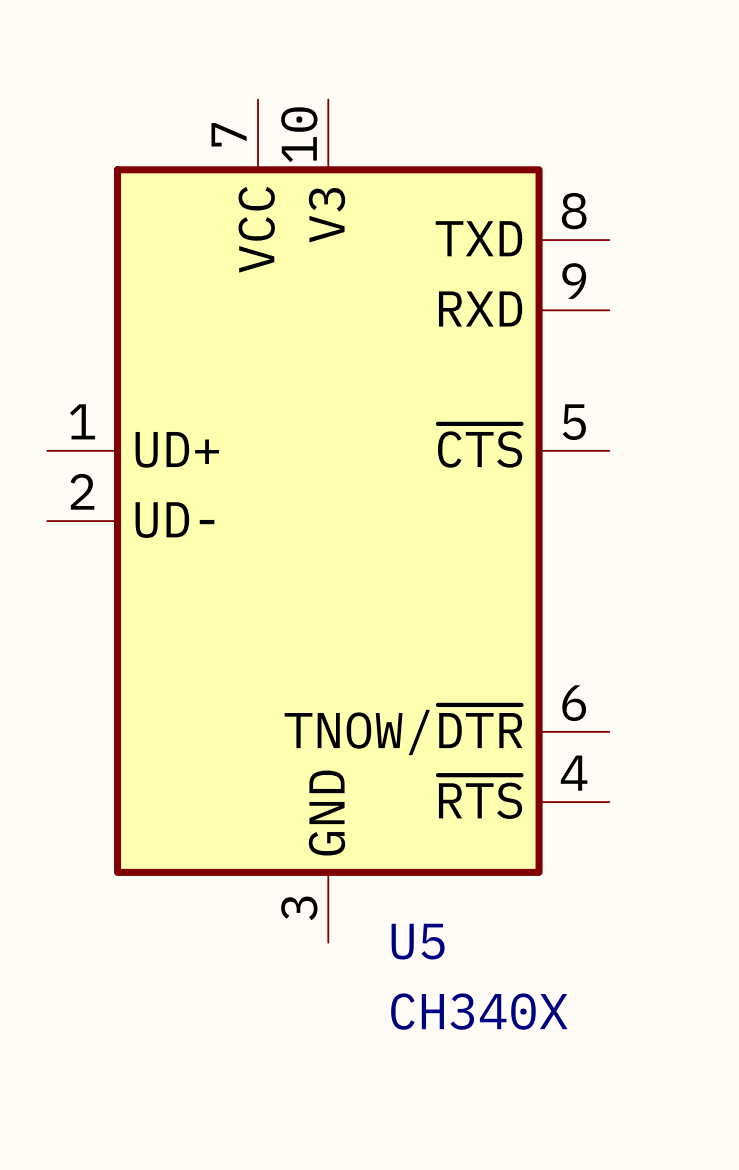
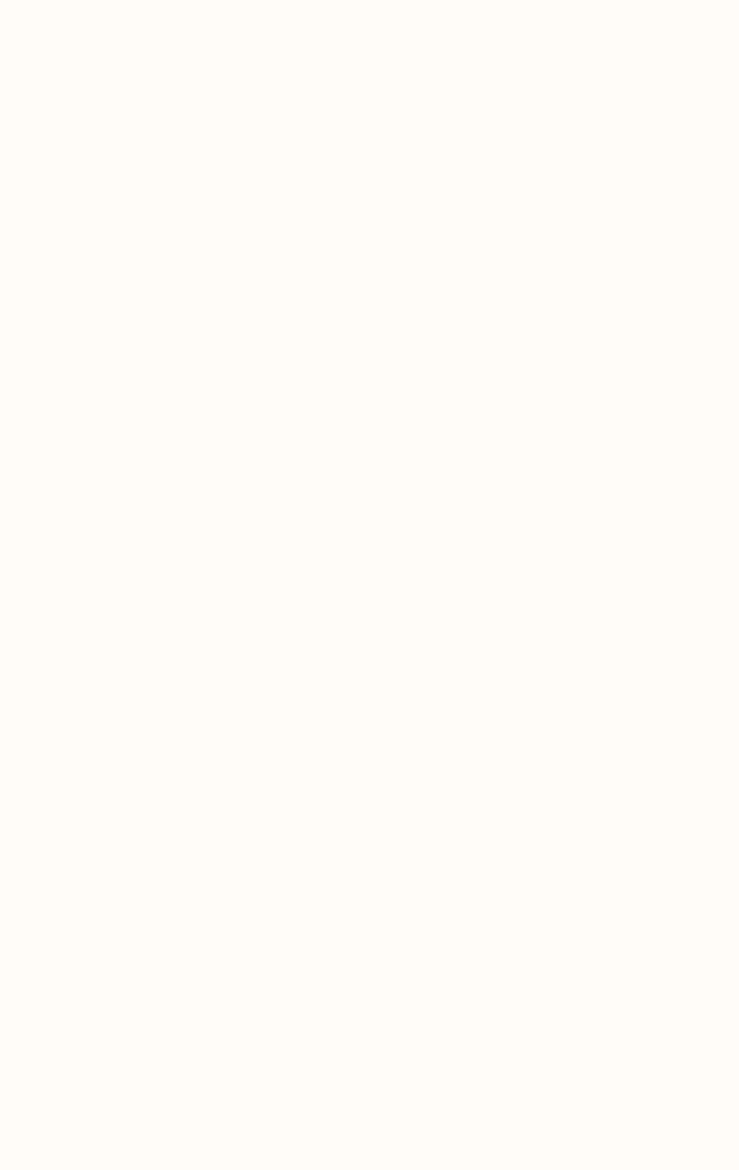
U5: CH340X (328, 521) -> none

